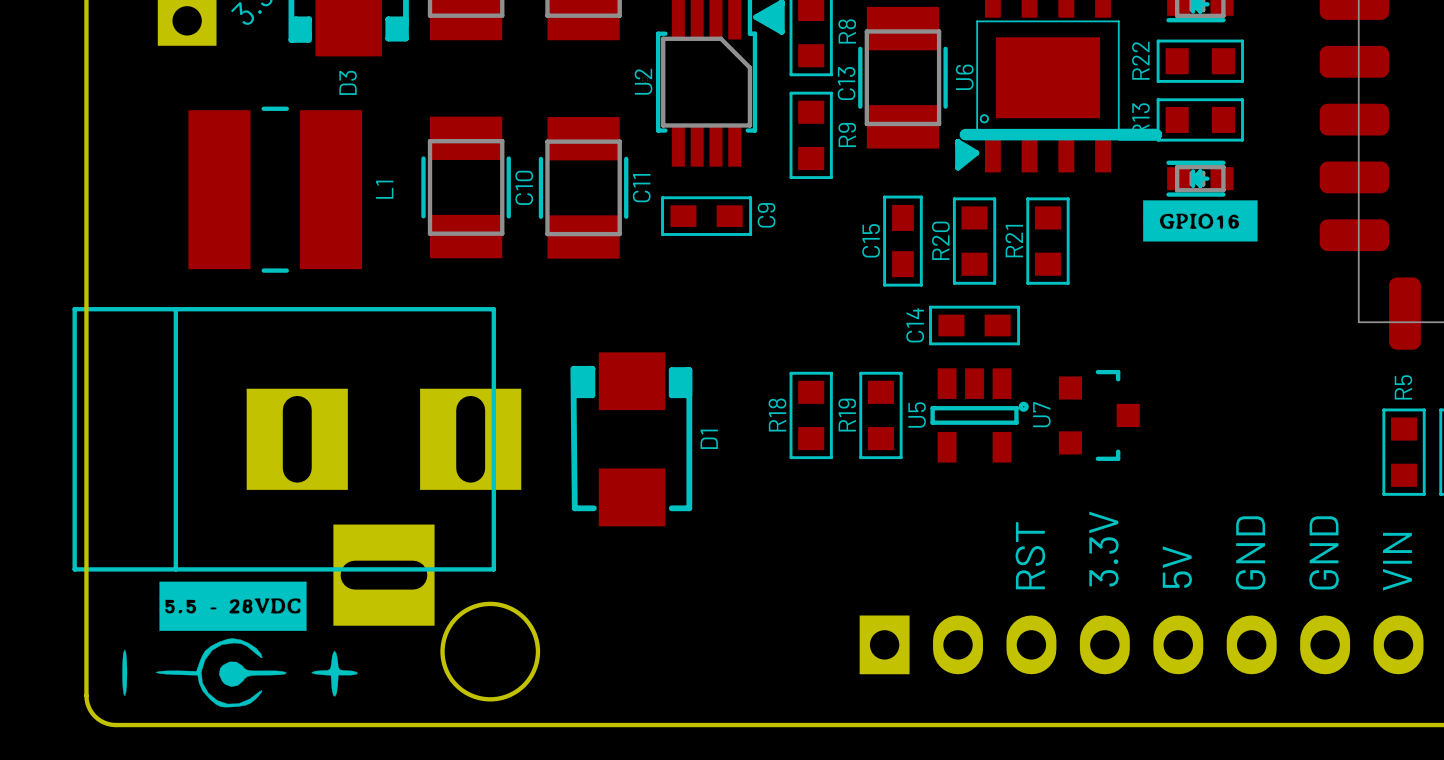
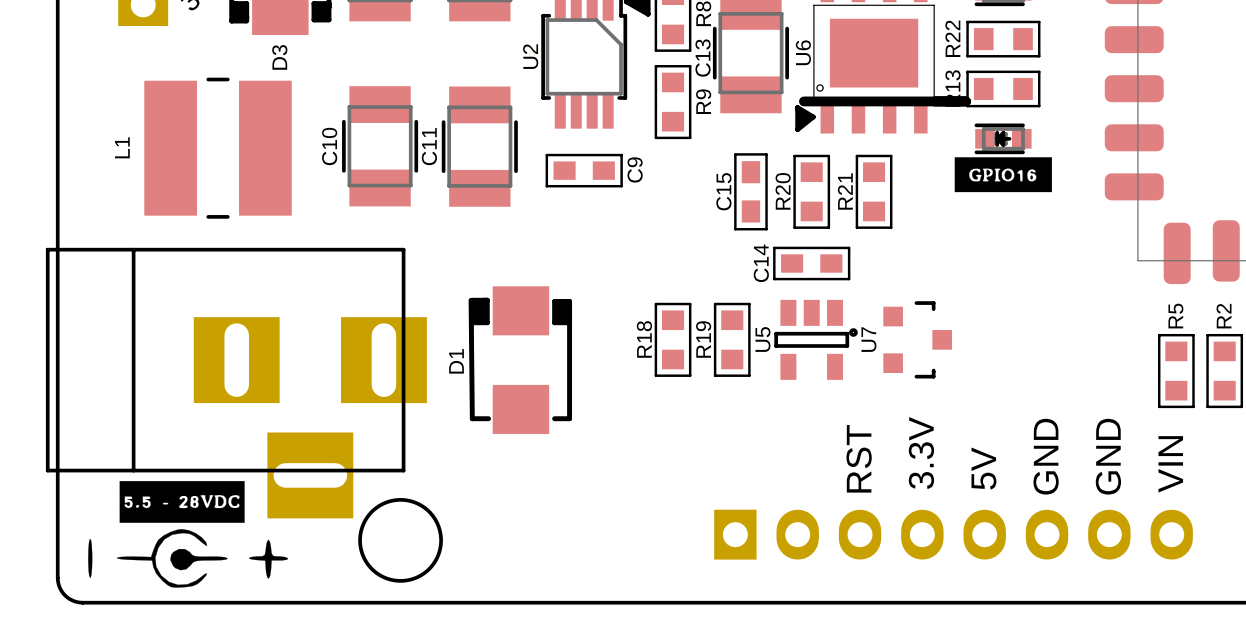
C10 name position: C10 (524, 187) -> C10 (329, 146)
C11 name position: C11 (641, 188) -> C11 (429, 146)
L1 name position: L1 (384, 189) -> L1 (122, 147)
D1 name position: D1 (709, 439) -> D1 (456, 361)

